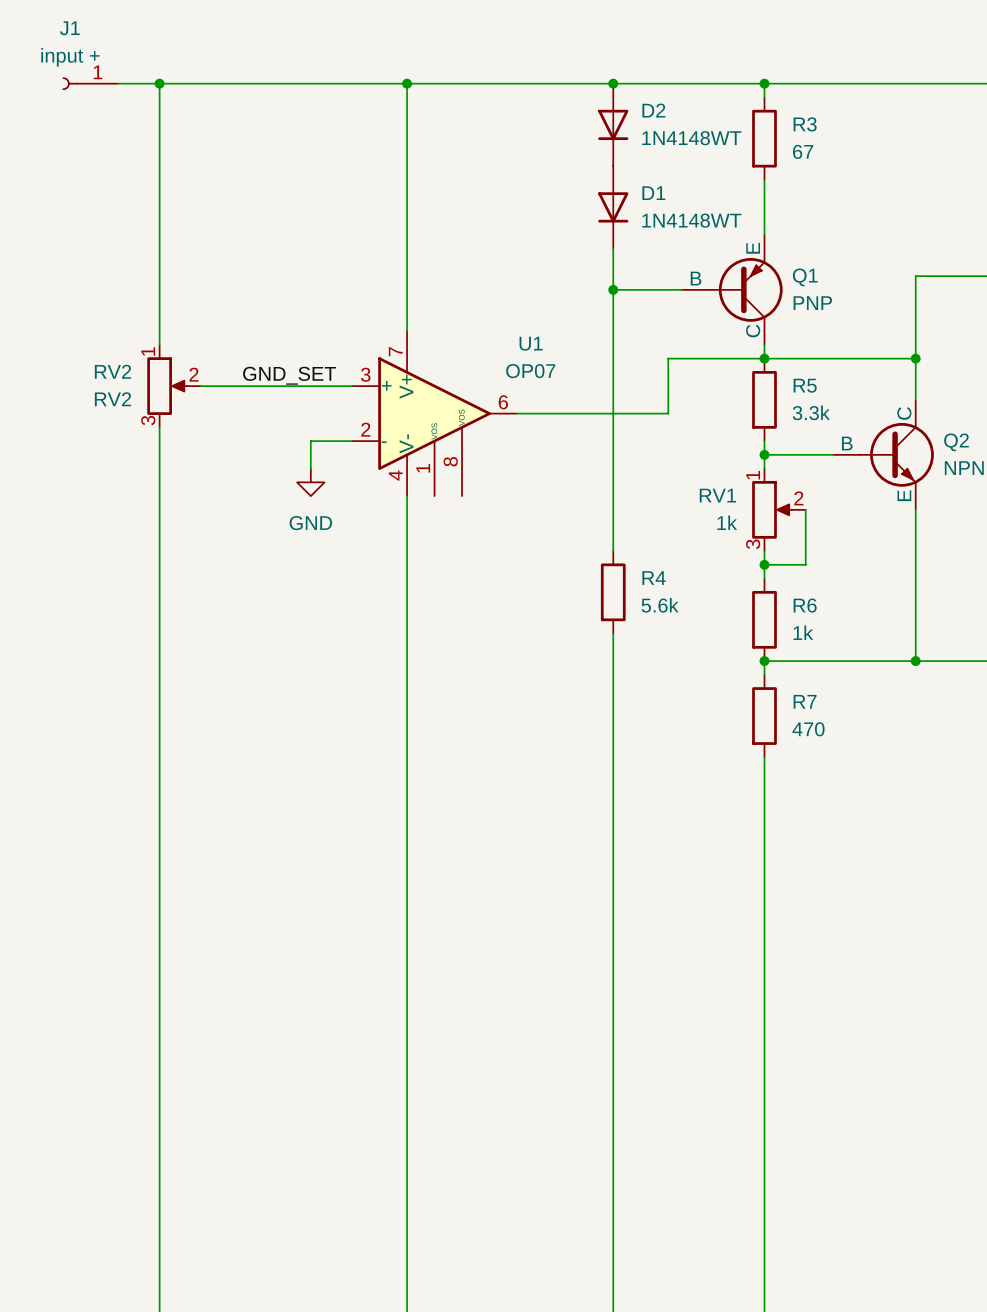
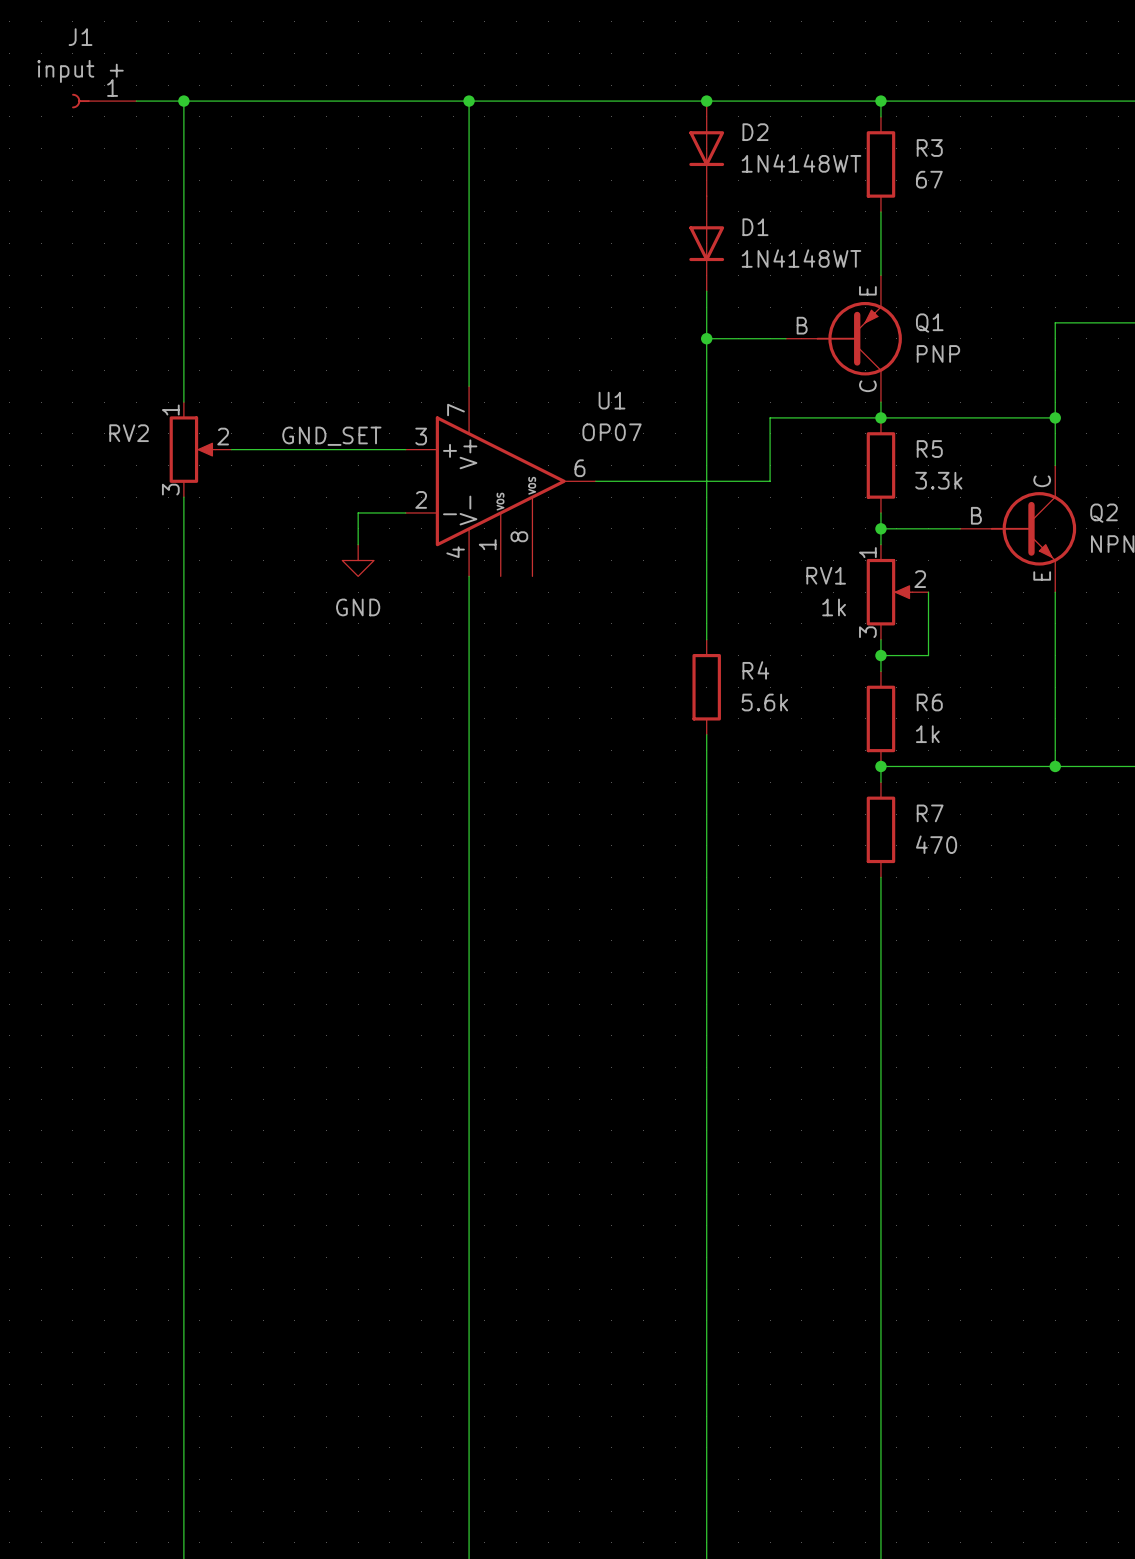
RV2 value: RV2 (112, 399) -> none

